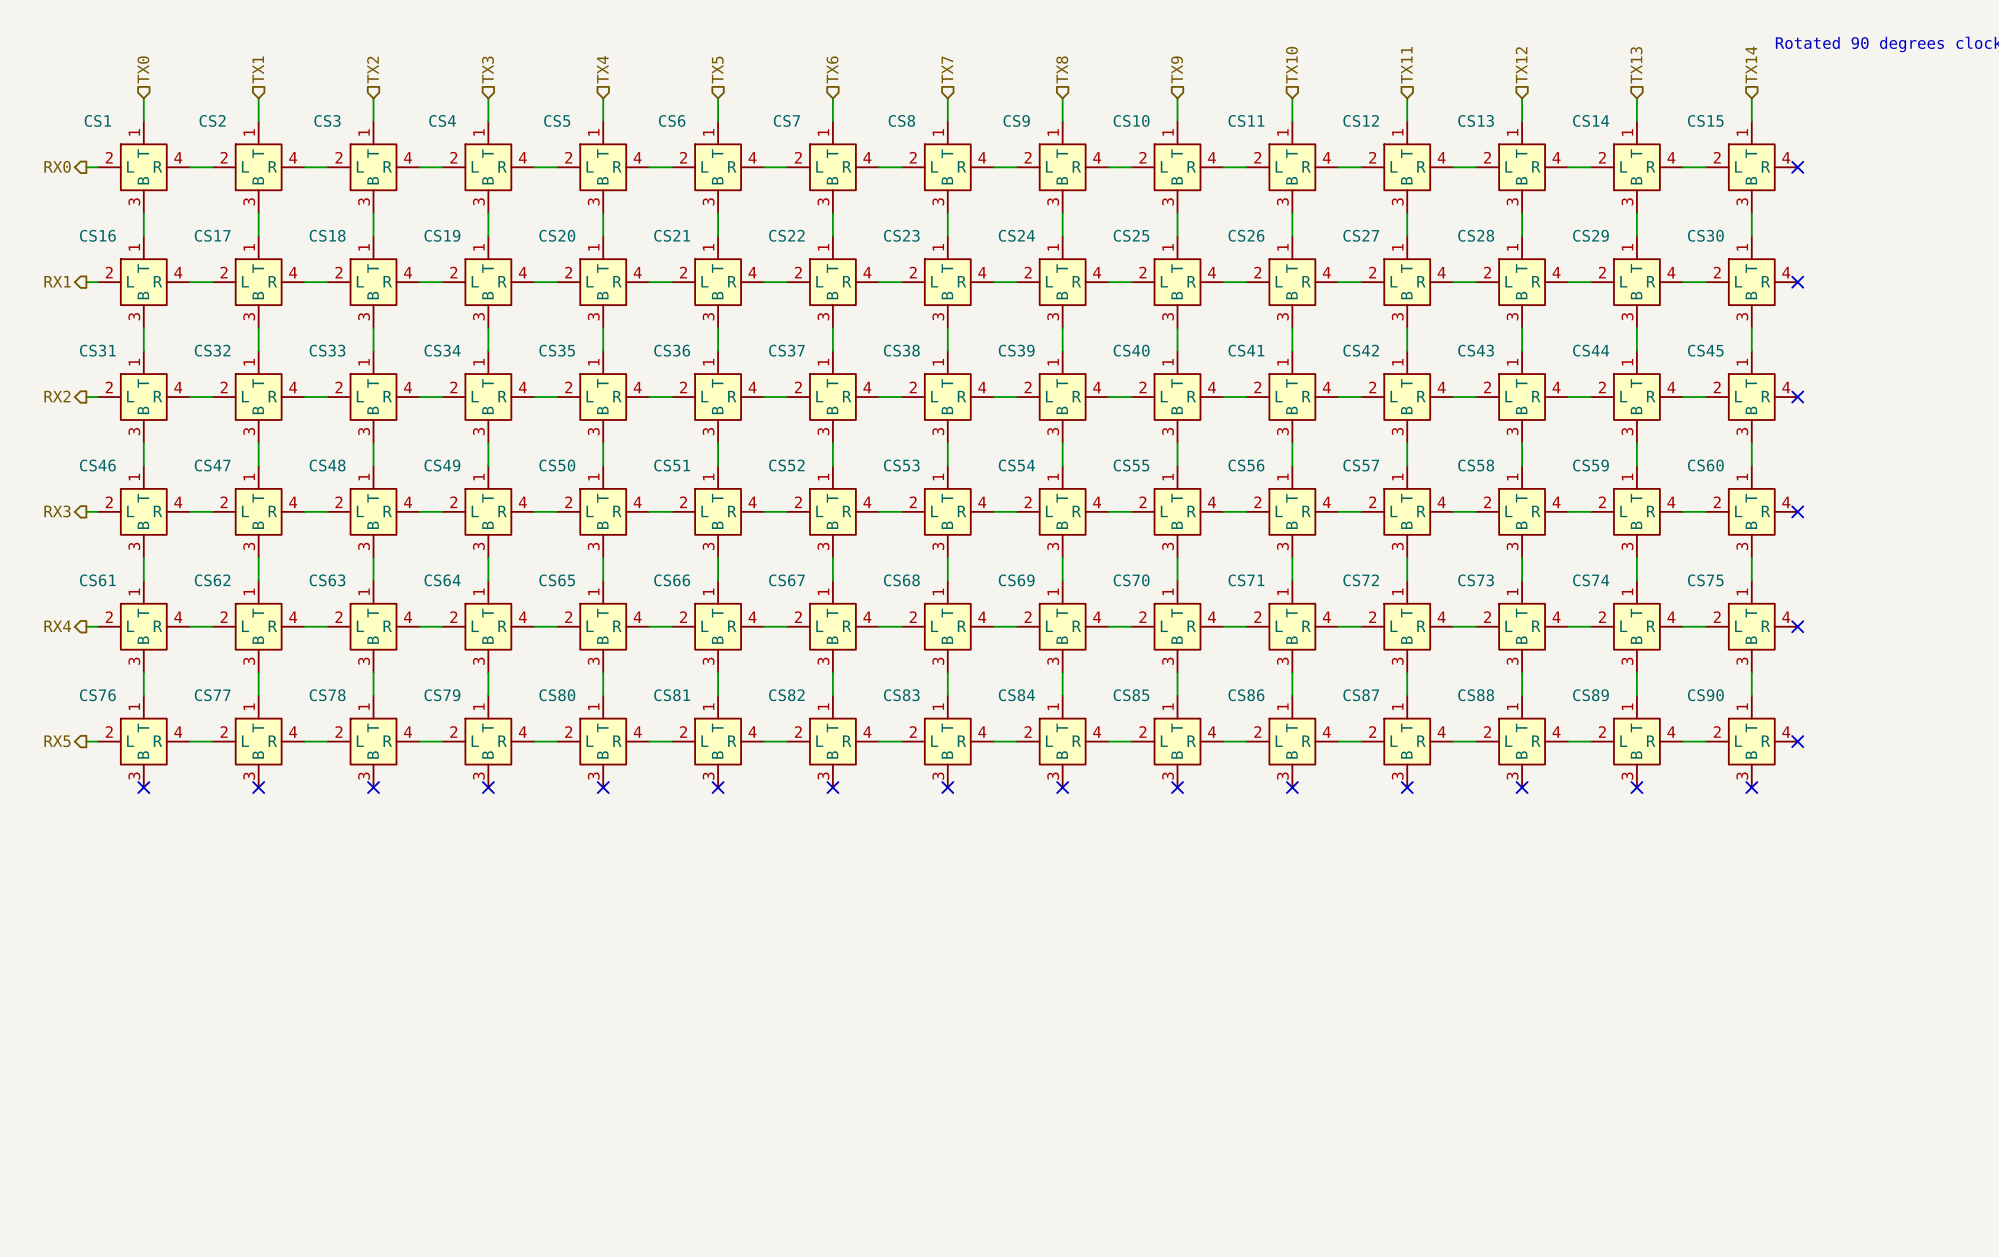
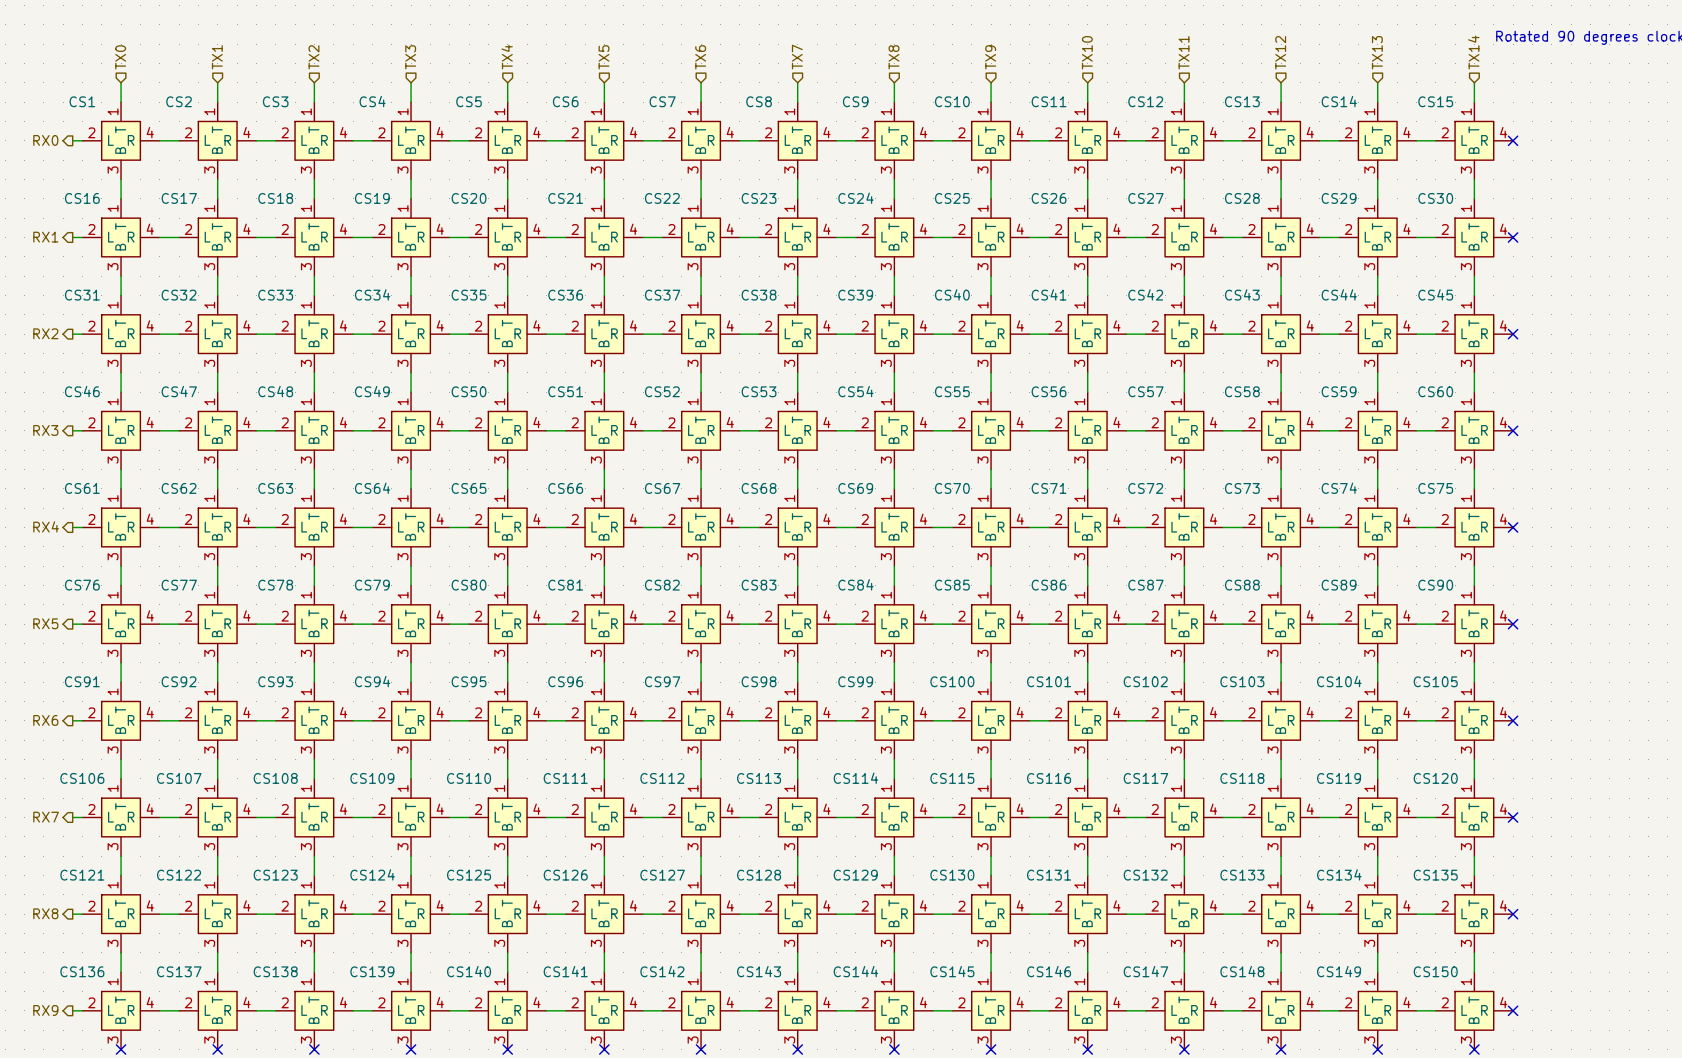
wire: none -> (121, 662) (121, 682)
no-connect mark: (143, 787) -> none
wire: none -> (217, 662) (217, 682)
no-connect mark: (258, 787) -> none
wire: none -> (314, 662) (314, 682)
no-connect mark: (373, 787) -> none
wire: none -> (411, 662) (411, 682)
no-connect mark: (488, 787) -> none
wire: none -> (507, 662) (507, 682)
no-connect mark: (603, 787) -> none
wire: none -> (604, 662) (604, 682)
no-connect mark: (718, 787) -> none
wire: none -> (701, 662) (701, 682)
no-connect mark: (832, 787) -> none
wire: none -> (797, 662) (797, 682)
no-connect mark: (947, 787) -> none
wire: none -> (894, 662) (894, 682)
no-connect mark: (1062, 787) -> none
wire: none -> (991, 662) (991, 682)
no-connect mark: (1177, 787) -> none
wire: none -> (1087, 662) (1087, 682)
no-connect mark: (1292, 787) -> none
wire: none -> (1184, 662) (1184, 682)
no-connect mark: (1407, 787) -> none
wire: none -> (1281, 662) (1281, 682)
no-connect mark: (1522, 787) -> none
wire: none -> (1377, 662) (1377, 682)
no-connect mark: (1636, 787) -> none
wire: none -> (1474, 662) (1474, 682)
no-connect mark: (1751, 787) -> none
hierarchical label: none -> RX6 (45, 720)
wire: none -> (72, 720) (82, 720)
CS91: none -> (121, 720)
wire: none -> (159, 720) (179, 720)
CS92: none -> (217, 720)
wire: none -> (256, 720) (275, 720)
CS93: none -> (314, 720)
wire: none -> (353, 720) (372, 720)
CS94: none -> (411, 720)
wire: none -> (449, 720) (469, 720)
CS95: none -> (507, 720)
wire: none -> (546, 720) (565, 720)
CS96: none -> (604, 720)
wire: none -> (643, 720) (662, 720)
CS97: none -> (701, 720)
wire: none -> (739, 720) (759, 720)
CS98: none -> (797, 720)
wire: none -> (836, 720) (855, 720)
CS99: none -> (894, 720)
wire: none -> (933, 720) (952, 720)
CS100: none -> (991, 720)
wire: none -> (1029, 720) (1049, 720)
CS101: none -> (1087, 720)
wire: none -> (1126, 720) (1145, 720)
CS102: none -> (1184, 720)
wire: none -> (1223, 720) (1242, 720)
CS103: none -> (1281, 720)
wire: none -> (1319, 720) (1339, 720)
CS104: none -> (1377, 720)
wire: none -> (1416, 720) (1435, 720)
CS105: none -> (1474, 720)
no-connect mark: none -> (1513, 720)
wire: none -> (121, 759) (121, 778)
wire: none -> (217, 759) (217, 778)
wire: none -> (314, 759) (314, 778)
wire: none -> (411, 759) (411, 778)
wire: none -> (507, 759) (507, 778)
wire: none -> (604, 759) (604, 778)
wire: none -> (701, 759) (701, 778)
wire: none -> (797, 759) (797, 778)
wire: none -> (894, 759) (894, 778)
wire: none -> (991, 759) (991, 778)
wire: none -> (1087, 759) (1087, 778)
wire: none -> (1184, 759) (1184, 778)
wire: none -> (1281, 759) (1281, 778)
wire: none -> (1377, 759) (1377, 778)
wire: none -> (1474, 759) (1474, 778)
hierarchical label: none -> RX7 (46, 817)
wire: none -> (72, 817) (82, 817)
CS106: none -> (121, 817)
wire: none -> (159, 817) (179, 817)
CS107: none -> (217, 817)
wire: none -> (256, 817) (275, 817)
CS108: none -> (314, 817)
wire: none -> (353, 817) (372, 817)
CS109: none -> (411, 817)
wire: none -> (449, 817) (469, 817)
CS110: none -> (507, 817)
wire: none -> (546, 817) (565, 817)
CS111: none -> (604, 817)
wire: none -> (643, 817) (662, 817)
CS112: none -> (701, 817)
wire: none -> (739, 817) (759, 817)
CS113: none -> (797, 817)
wire: none -> (836, 817) (855, 817)
CS114: none -> (894, 817)
wire: none -> (933, 817) (952, 817)
CS115: none -> (991, 817)
wire: none -> (1029, 817) (1049, 817)
CS116: none -> (1087, 817)
wire: none -> (1126, 817) (1145, 817)
CS117: none -> (1184, 817)
wire: none -> (1223, 817) (1242, 817)
CS118: none -> (1281, 817)
wire: none -> (1319, 817) (1339, 817)
CS119: none -> (1377, 817)
wire: none -> (1416, 817) (1435, 817)
CS120: none -> (1474, 817)
no-connect mark: none -> (1513, 817)
wire: none -> (121, 856) (121, 875)
wire: none -> (217, 856) (217, 875)
wire: none -> (314, 856) (314, 875)
wire: none -> (411, 856) (411, 875)
wire: none -> (507, 856) (507, 875)
wire: none -> (604, 856) (604, 875)
wire: none -> (701, 856) (701, 875)
wire: none -> (797, 856) (797, 875)
wire: none -> (894, 856) (894, 875)
wire: none -> (991, 856) (991, 875)
wire: none -> (1087, 856) (1087, 875)
wire: none -> (1184, 856) (1184, 875)
wire: none -> (1281, 856) (1281, 875)
wire: none -> (1377, 856) (1377, 875)
wire: none -> (1474, 856) (1474, 875)
hierarchical label: none -> RX8 (45, 913)
wire: none -> (72, 914) (82, 914)
CS121: none -> (121, 914)
wire: none -> (159, 914) (179, 914)
CS122: none -> (217, 914)
wire: none -> (256, 914) (275, 914)
CS123: none -> (314, 914)
wire: none -> (353, 914) (372, 914)
CS124: none -> (411, 914)
wire: none -> (449, 914) (469, 914)
CS125: none -> (507, 914)
wire: none -> (546, 914) (565, 914)
CS126: none -> (604, 914)
wire: none -> (643, 914) (662, 914)
CS127: none -> (701, 914)
wire: none -> (739, 914) (759, 914)
CS128: none -> (797, 914)
wire: none -> (836, 914) (855, 914)
CS129: none -> (894, 914)
wire: none -> (933, 914) (952, 914)
CS130: none -> (991, 914)
wire: none -> (1029, 914) (1049, 914)
CS131: none -> (1087, 914)
wire: none -> (1126, 914) (1145, 914)
CS132: none -> (1184, 914)
wire: none -> (1223, 914) (1242, 914)
CS133: none -> (1281, 914)
wire: none -> (1319, 914) (1339, 914)
CS134: none -> (1377, 914)
wire: none -> (1416, 914) (1435, 914)
CS135: none -> (1474, 914)
no-connect mark: none -> (1513, 914)
wire: none -> (121, 952) (121, 972)
wire: none -> (217, 952) (217, 972)
wire: none -> (314, 952) (314, 972)
wire: none -> (411, 952) (411, 972)
wire: none -> (507, 952) (507, 972)
wire: none -> (604, 952) (604, 972)
wire: none -> (701, 952) (701, 972)
wire: none -> (797, 952) (797, 972)
wire: none -> (894, 952) (894, 972)
wire: none -> (991, 952) (991, 972)
wire: none -> (1087, 952) (1087, 972)
wire: none -> (1184, 952) (1184, 972)
wire: none -> (1281, 952) (1281, 972)
wire: none -> (1377, 952) (1377, 972)
wire: none -> (1474, 952) (1474, 972)
hierarchical label: none -> RX9 (45, 1010)
wire: none -> (72, 1010) (82, 1010)
CS136: none -> (121, 1010)
wire: none -> (159, 1010) (179, 1010)
CS137: none -> (217, 1010)
wire: none -> (256, 1010) (275, 1010)
CS138: none -> (314, 1010)
wire: none -> (353, 1010) (372, 1010)
CS139: none -> (411, 1010)
wire: none -> (449, 1010) (469, 1010)
CS140: none -> (507, 1010)
wire: none -> (546, 1010) (565, 1010)
CS141: none -> (604, 1010)
wire: none -> (643, 1010) (662, 1010)
CS142: none -> (701, 1010)
wire: none -> (739, 1010) (759, 1010)
CS143: none -> (797, 1010)
wire: none -> (836, 1010) (855, 1010)
CS144: none -> (894, 1010)
wire: none -> (933, 1010) (952, 1010)
CS145: none -> (991, 1010)
wire: none -> (1029, 1010) (1049, 1010)
CS146: none -> (1087, 1010)
wire: none -> (1126, 1010) (1145, 1010)
CS147: none -> (1184, 1010)
wire: none -> (1223, 1010) (1242, 1010)
CS148: none -> (1281, 1010)
wire: none -> (1319, 1010) (1339, 1010)
CS149: none -> (1377, 1010)
wire: none -> (1416, 1010) (1435, 1010)
CS150: none -> (1474, 1010)
no-connect mark: none -> (1513, 1010)
no-connect mark: none -> (121, 1049)
no-connect mark: none -> (217, 1049)
no-connect mark: none -> (314, 1049)
no-connect mark: none -> (411, 1049)
no-connect mark: none -> (507, 1049)
no-connect mark: none -> (604, 1049)
no-connect mark: none -> (701, 1049)
no-connect mark: none -> (797, 1049)
no-connect mark: none -> (894, 1049)
no-connect mark: none -> (991, 1049)
no-connect mark: none -> (1087, 1049)
no-connect mark: none -> (1184, 1049)
no-connect mark: none -> (1281, 1049)
no-connect mark: none -> (1377, 1049)
no-connect mark: none -> (1474, 1049)

